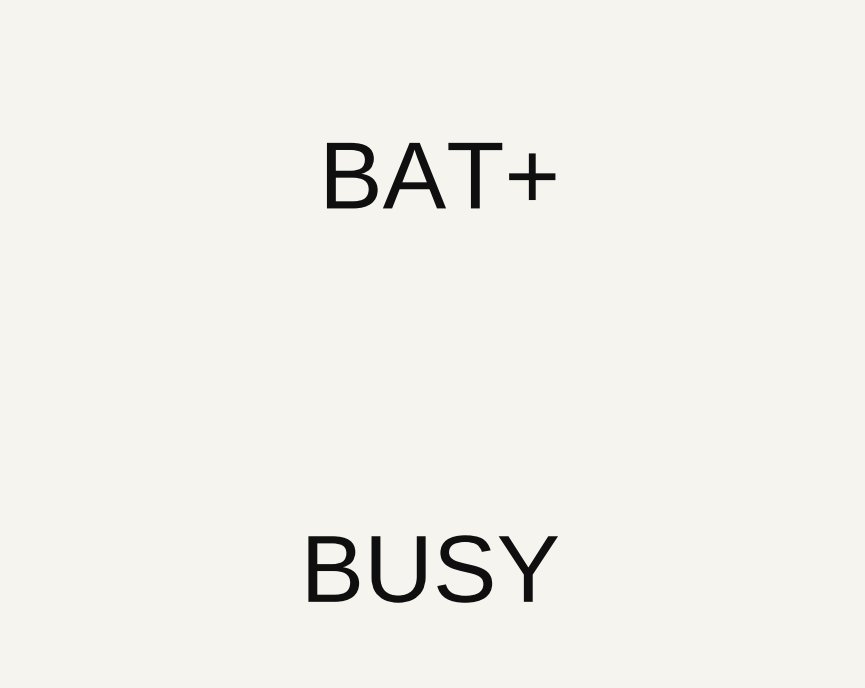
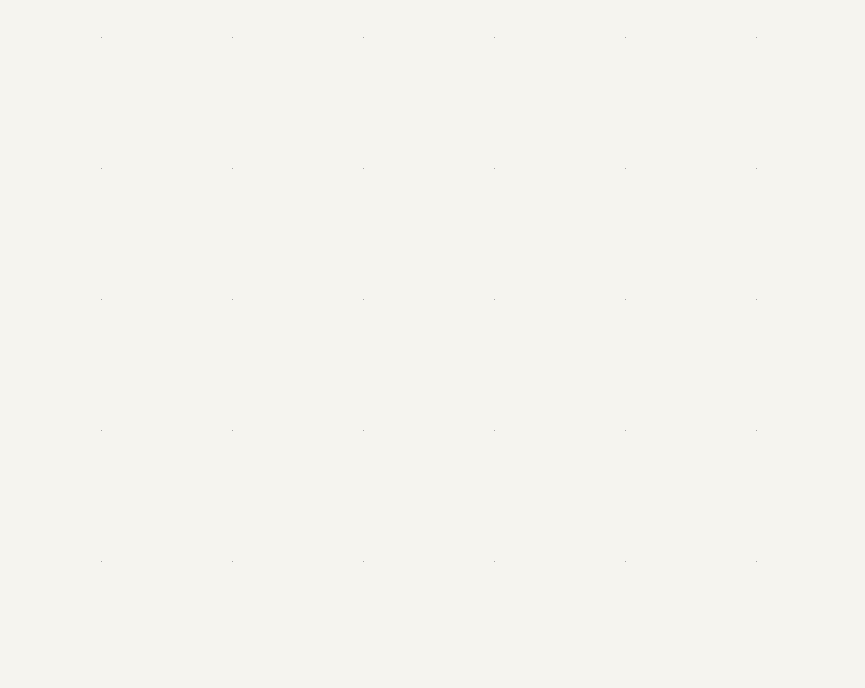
label: BAT+ (441, 175) -> none
label: BUSY (433, 569) -> none

